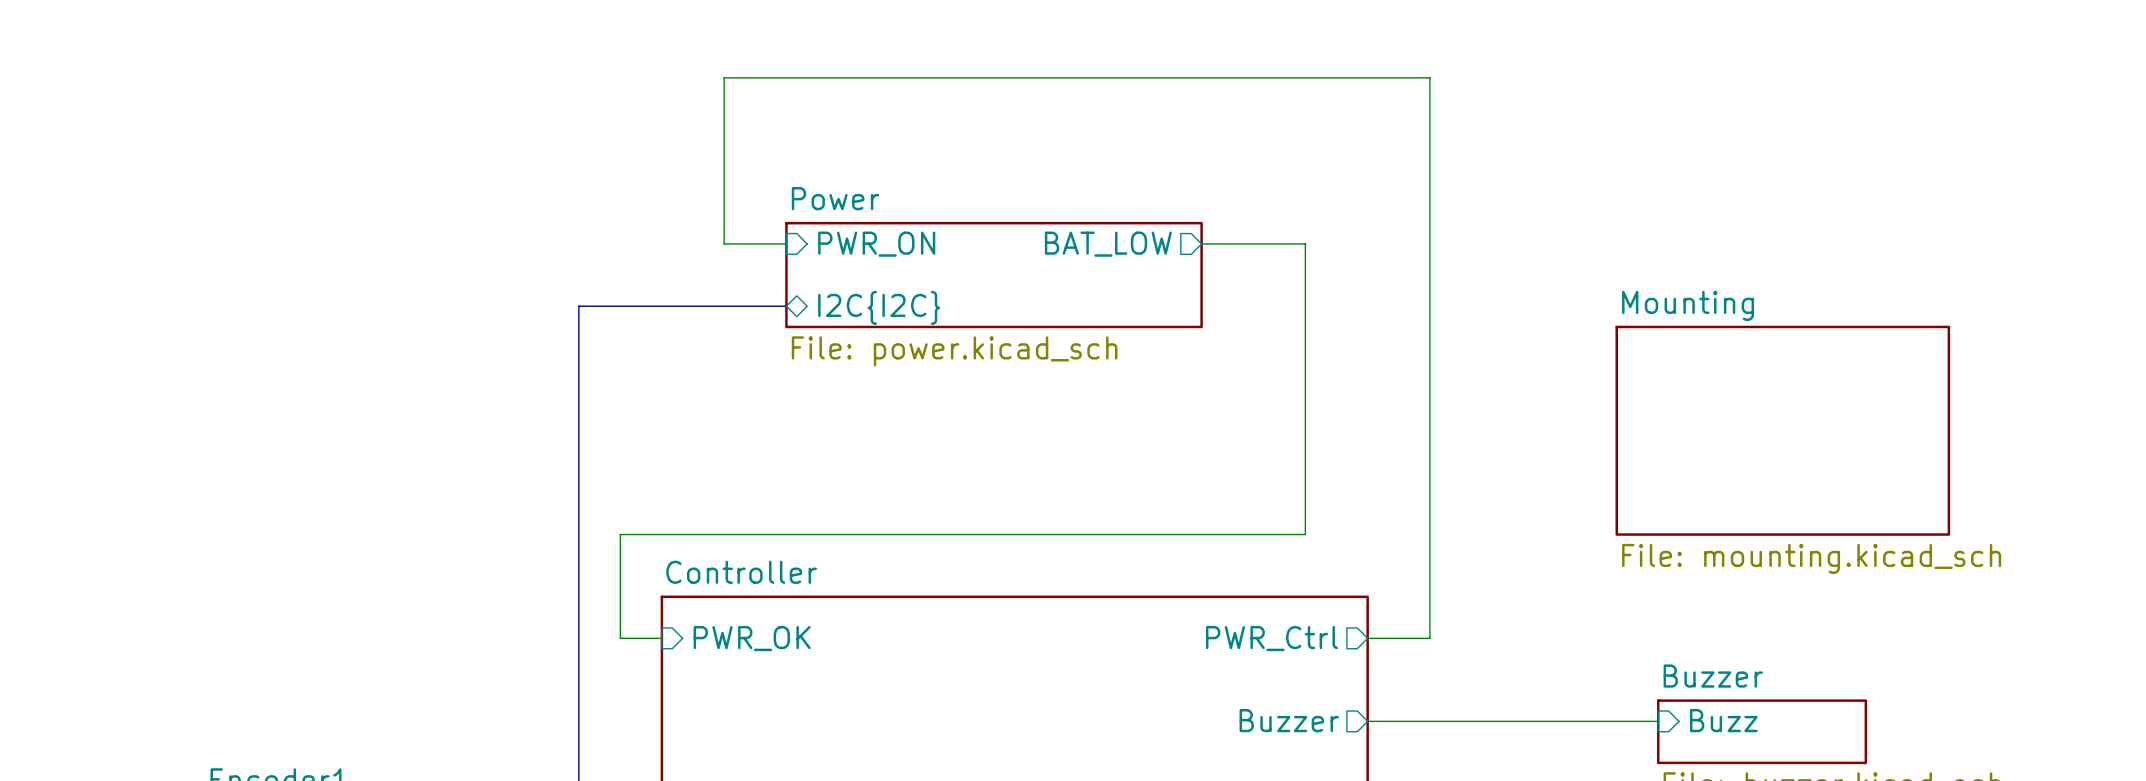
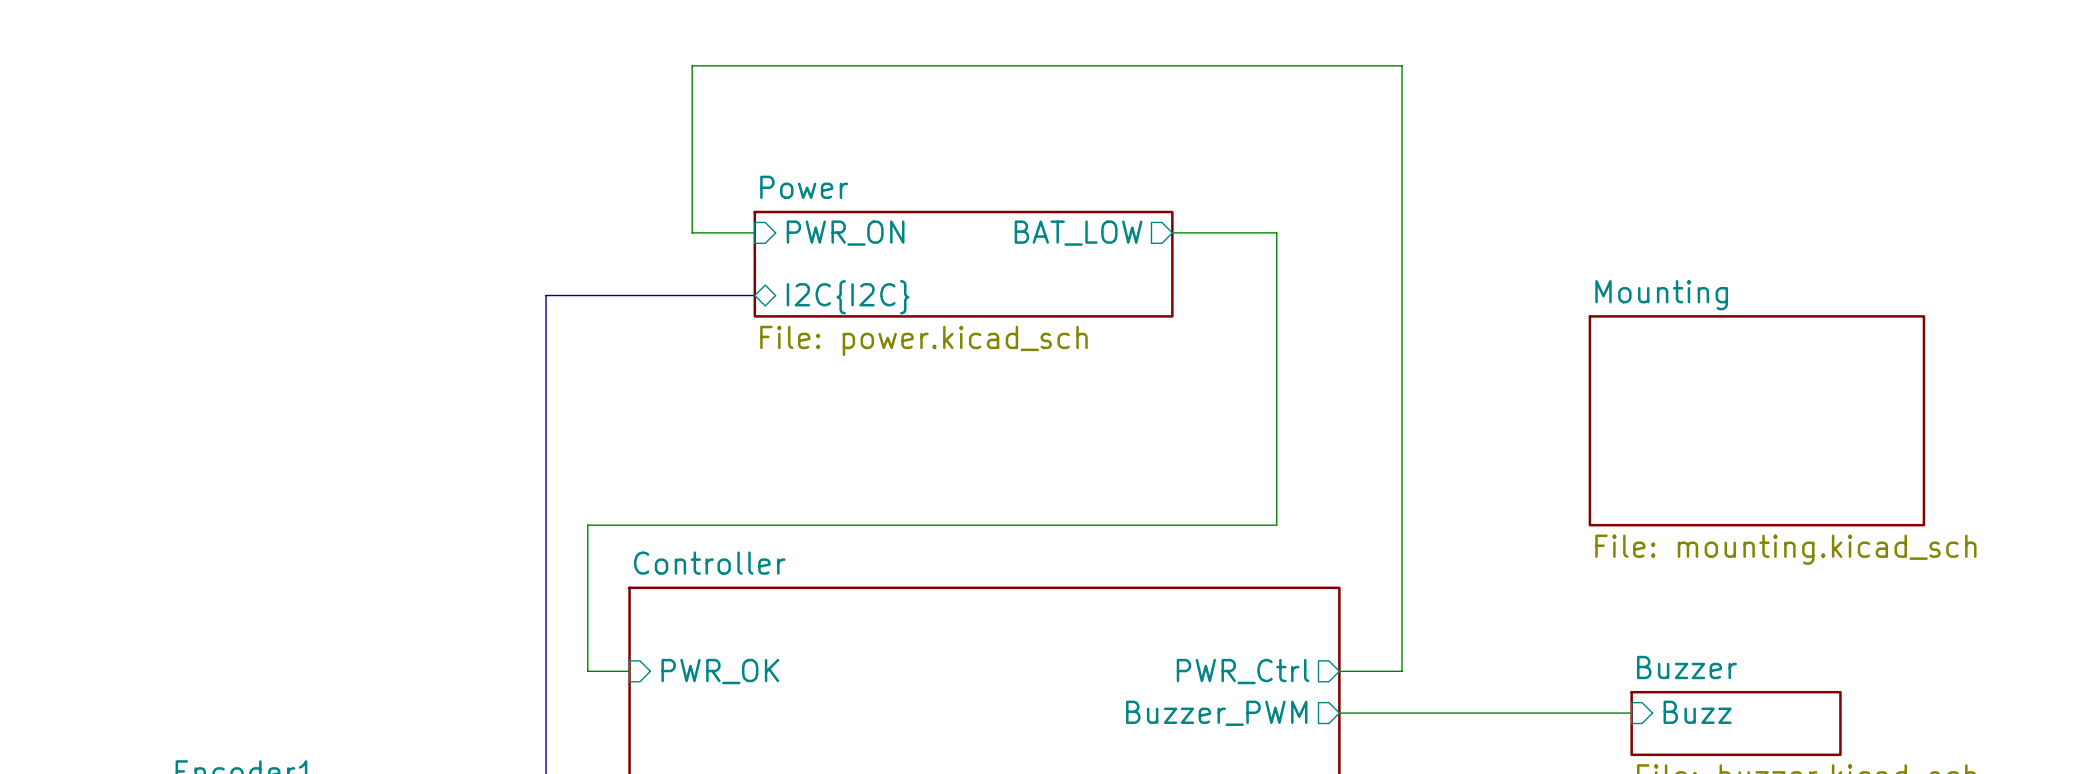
wire: (620, 638) (661, 638) -> (587, 629) (587, 671) (629, 671)
sheet pin position: PWR_OK (752, 638) -> PWR_OK (720, 671)
sheet pin position: PWR_Ctrl (1271, 638) -> PWR_Ctrl (1243, 671)
wire: (1367, 638) (1429, 638) -> (1339, 671) (1402, 671) (1402, 629)
sheet pin: Buzzer (1289, 720) -> Buzzer_PWM (1216, 713)

